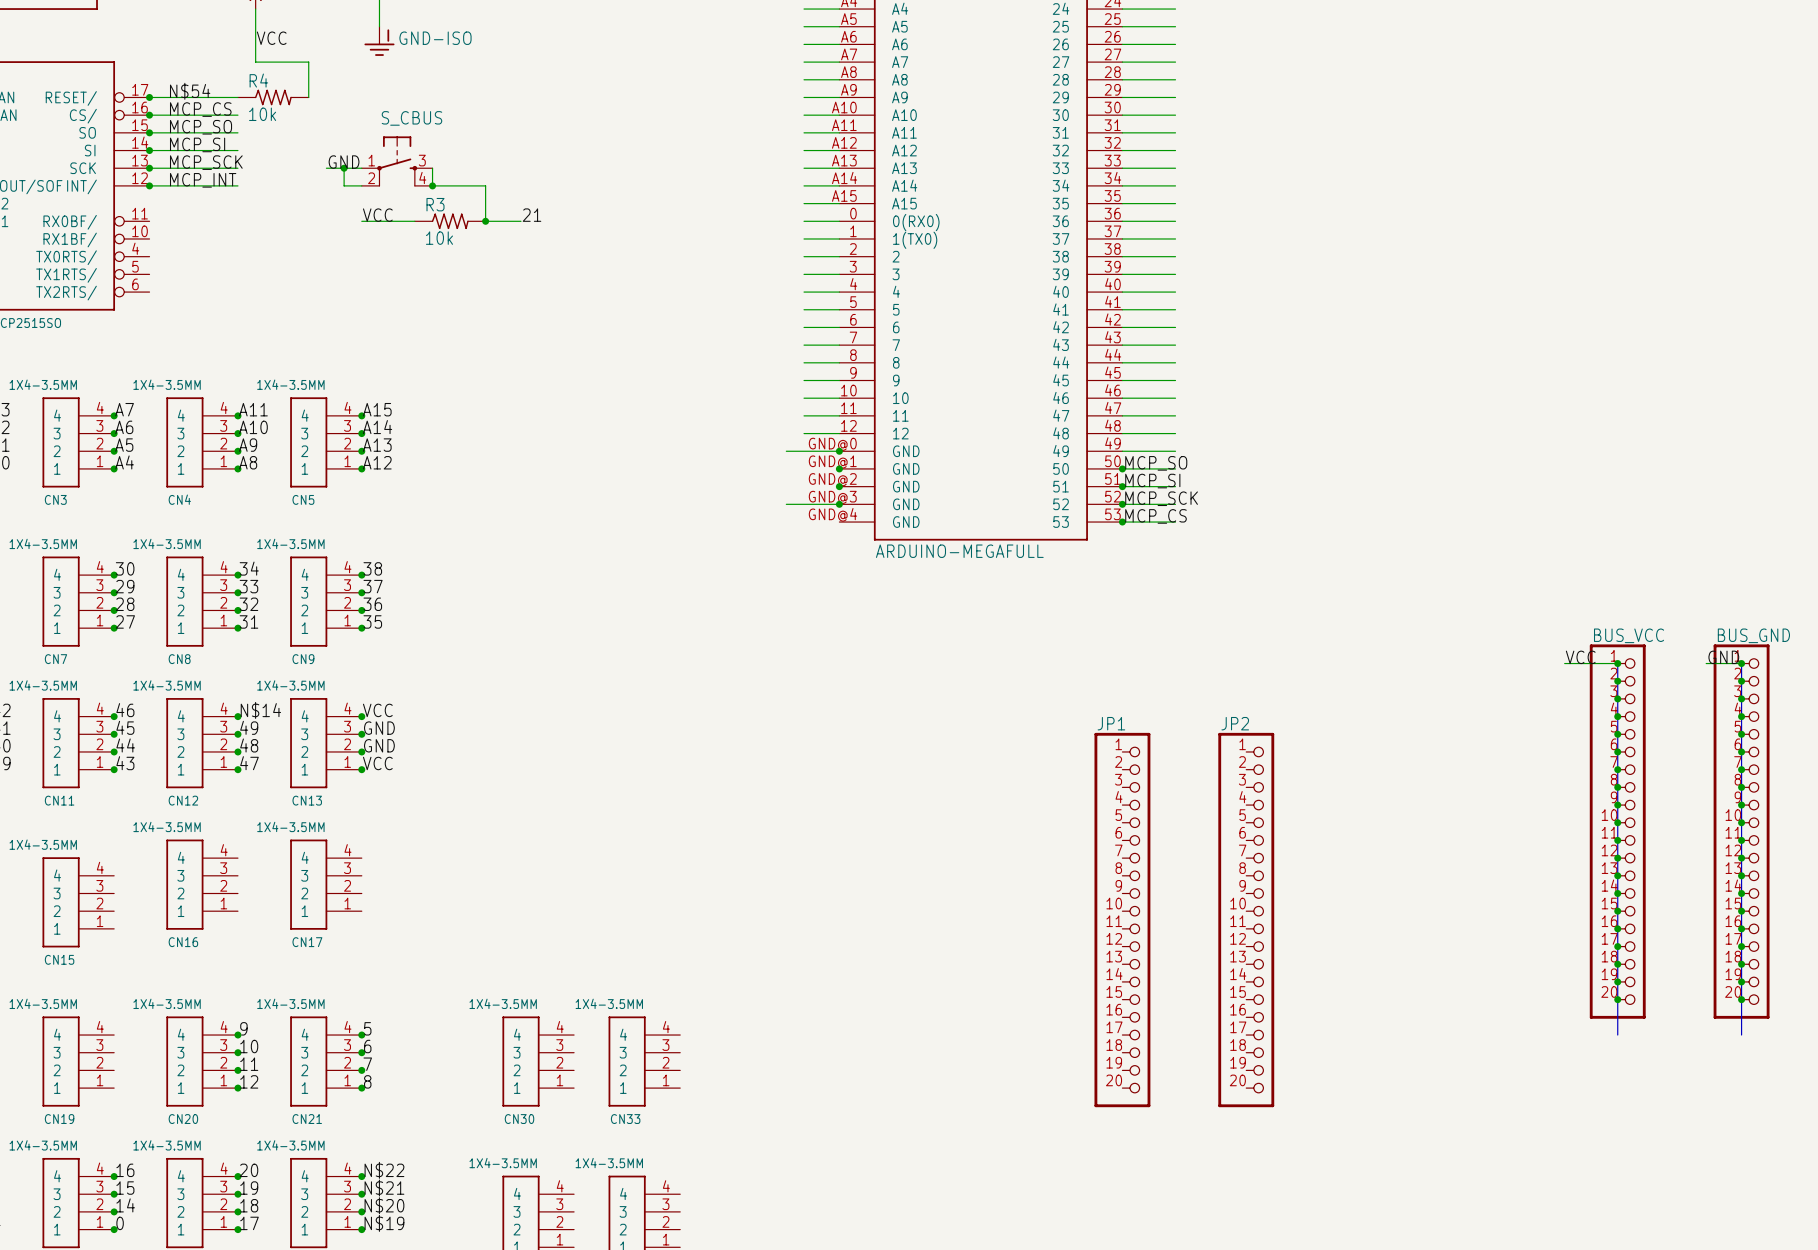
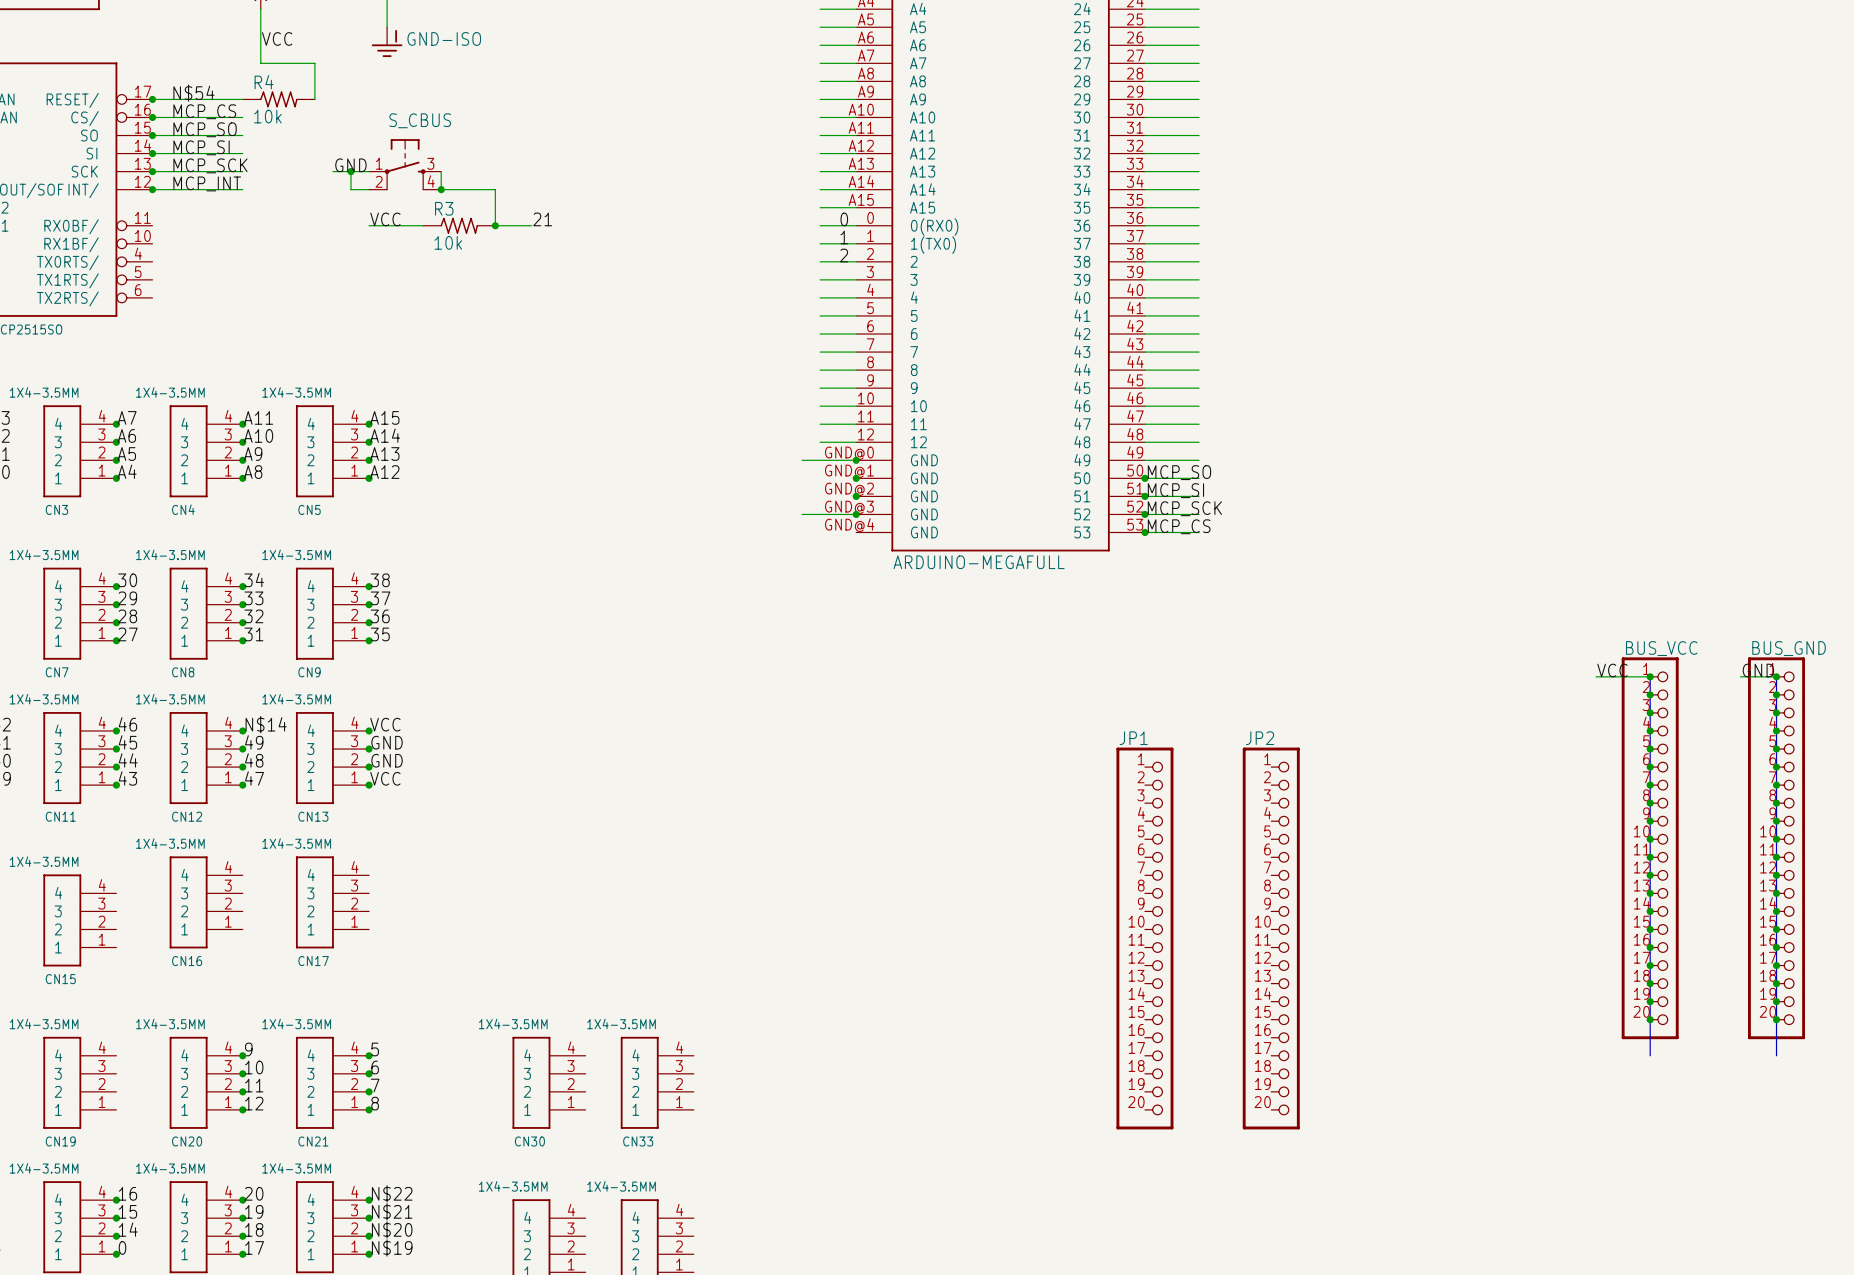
label: none -> 0 (844, 219)
label: none -> 1 (844, 237)
label: none -> 2 (844, 255)

